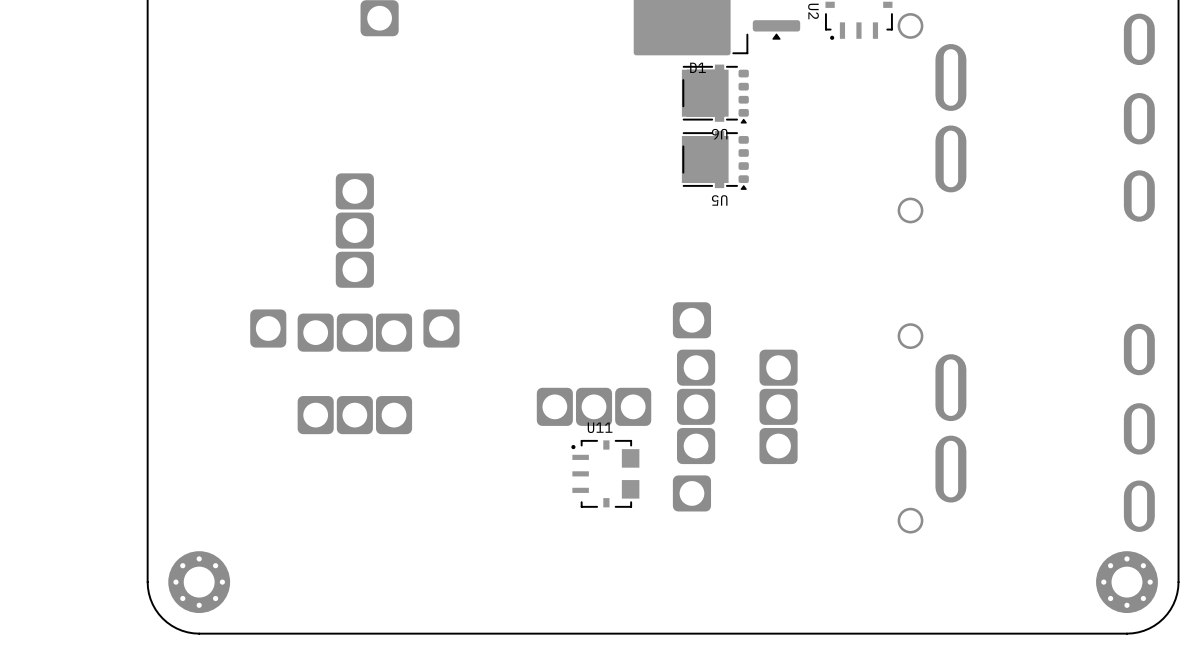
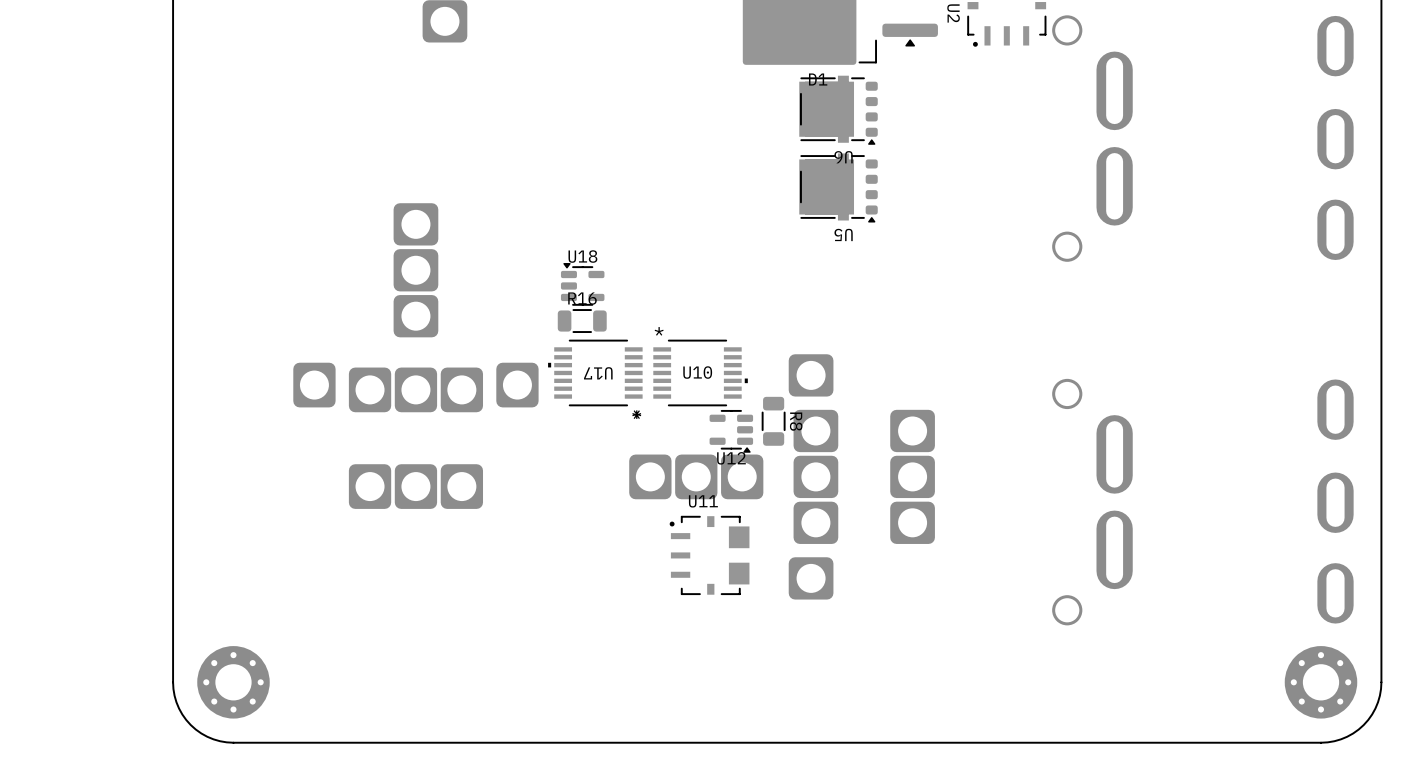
U18: none -> (582, 284)
R16: none -> (582, 321)
U17: none -> (595, 372)
U10: none -> (700, 372)
R8: none -> (773, 421)
U12: none -> (731, 431)

